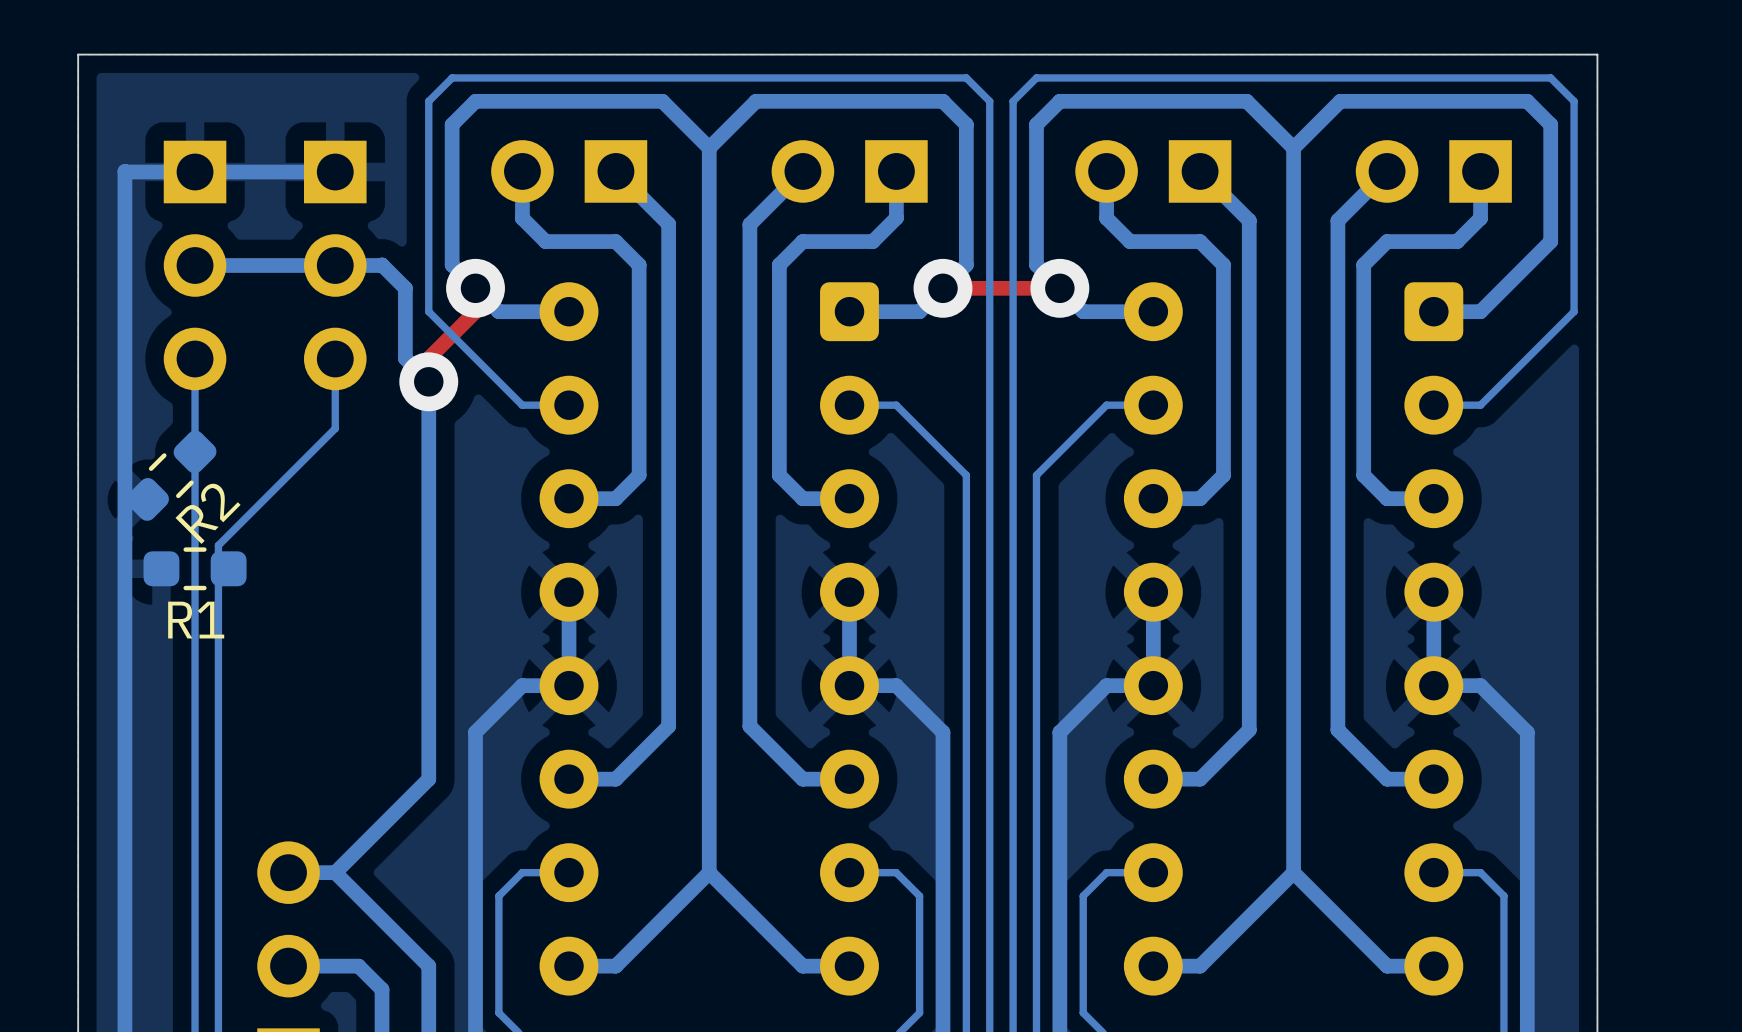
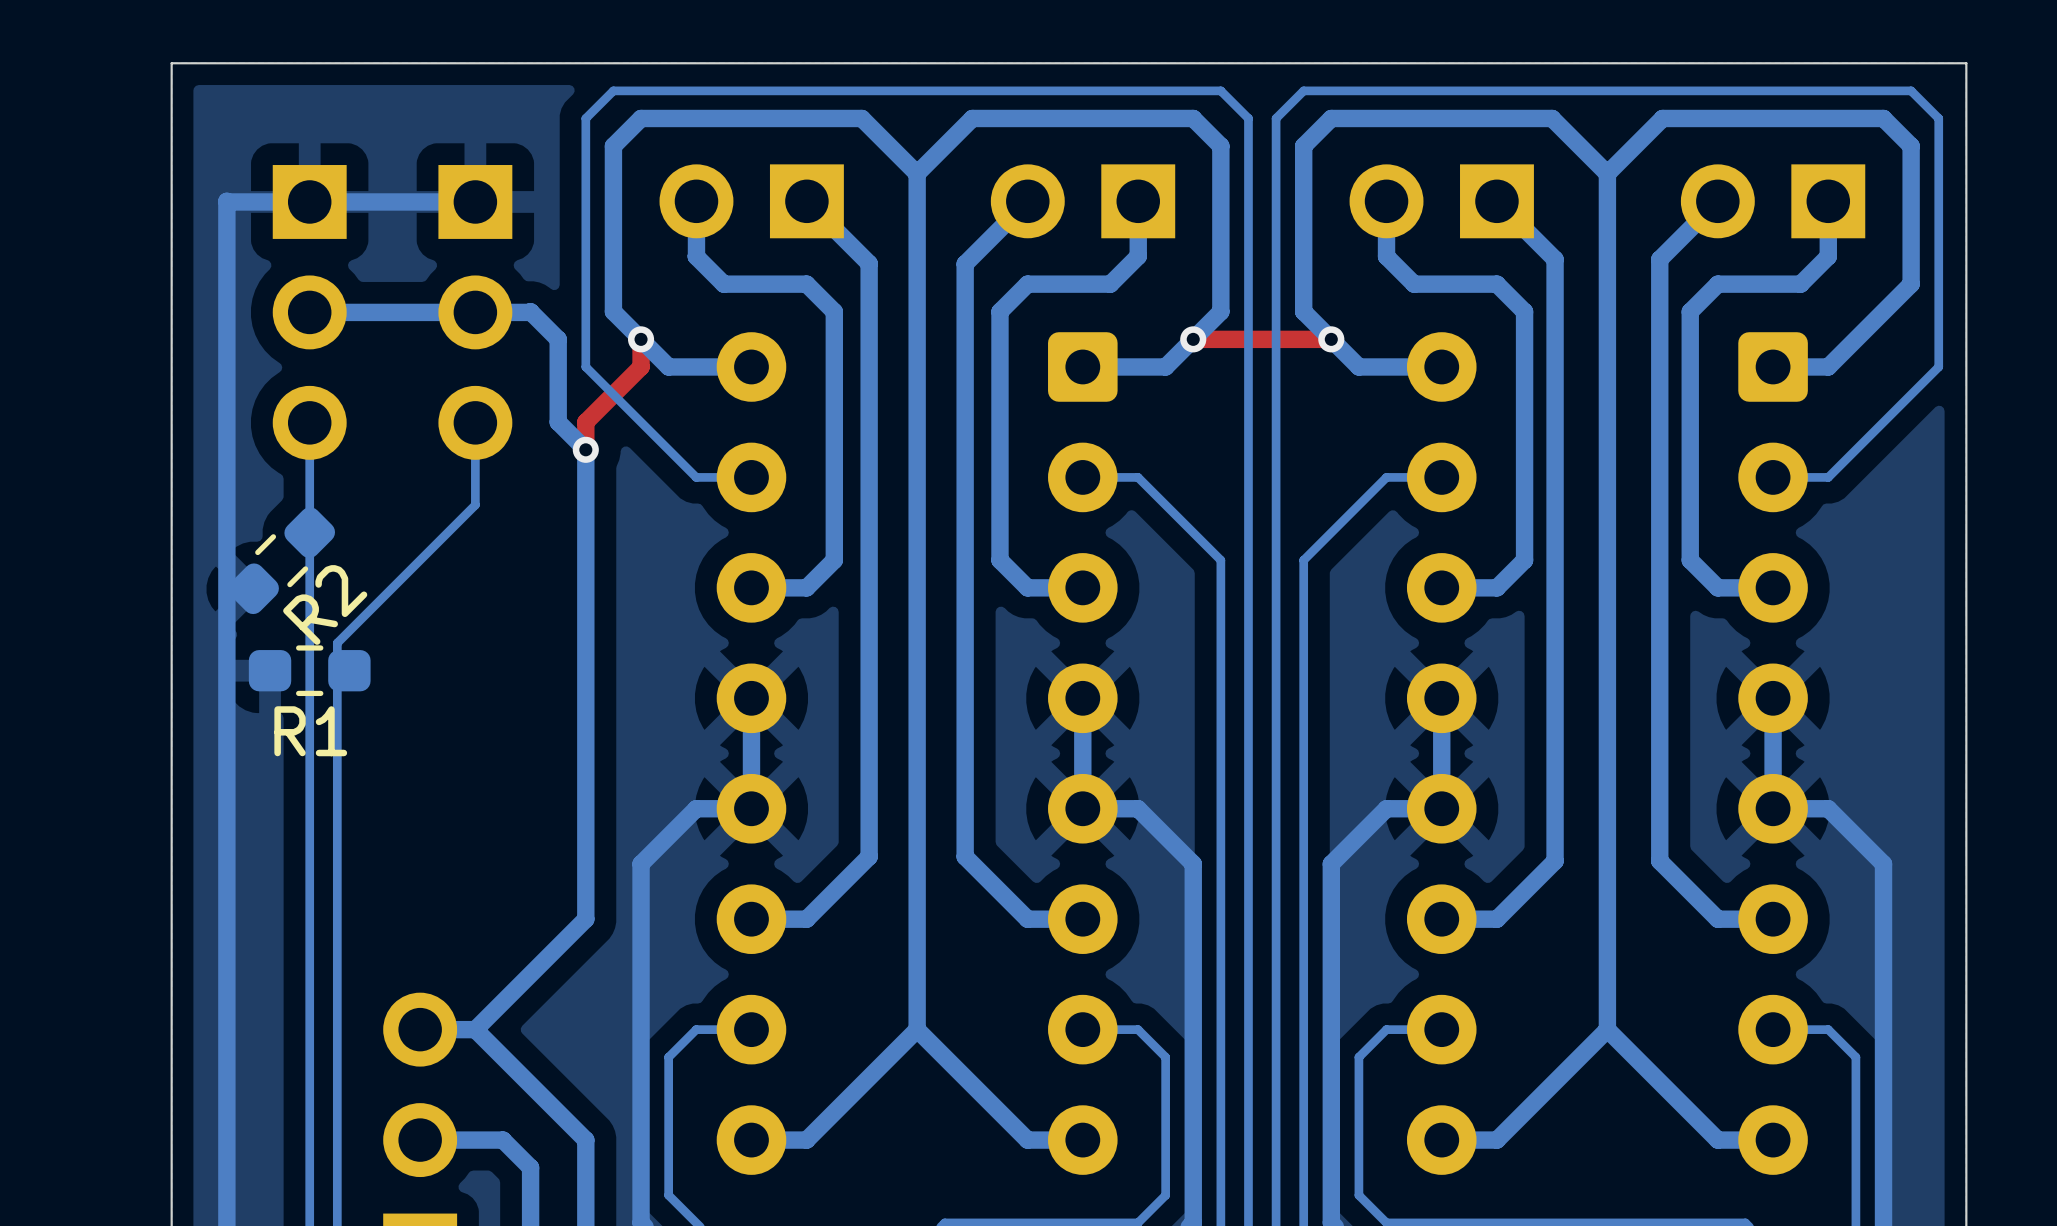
via size: [446, 258, 505, 318] -> [627, 326, 655, 353]
via size: [913, 258, 973, 318] -> [1180, 326, 1207, 353]
via size: [1030, 258, 1090, 318] -> [1318, 326, 1345, 353]
via size: [399, 352, 459, 412] -> [572, 436, 599, 463]

